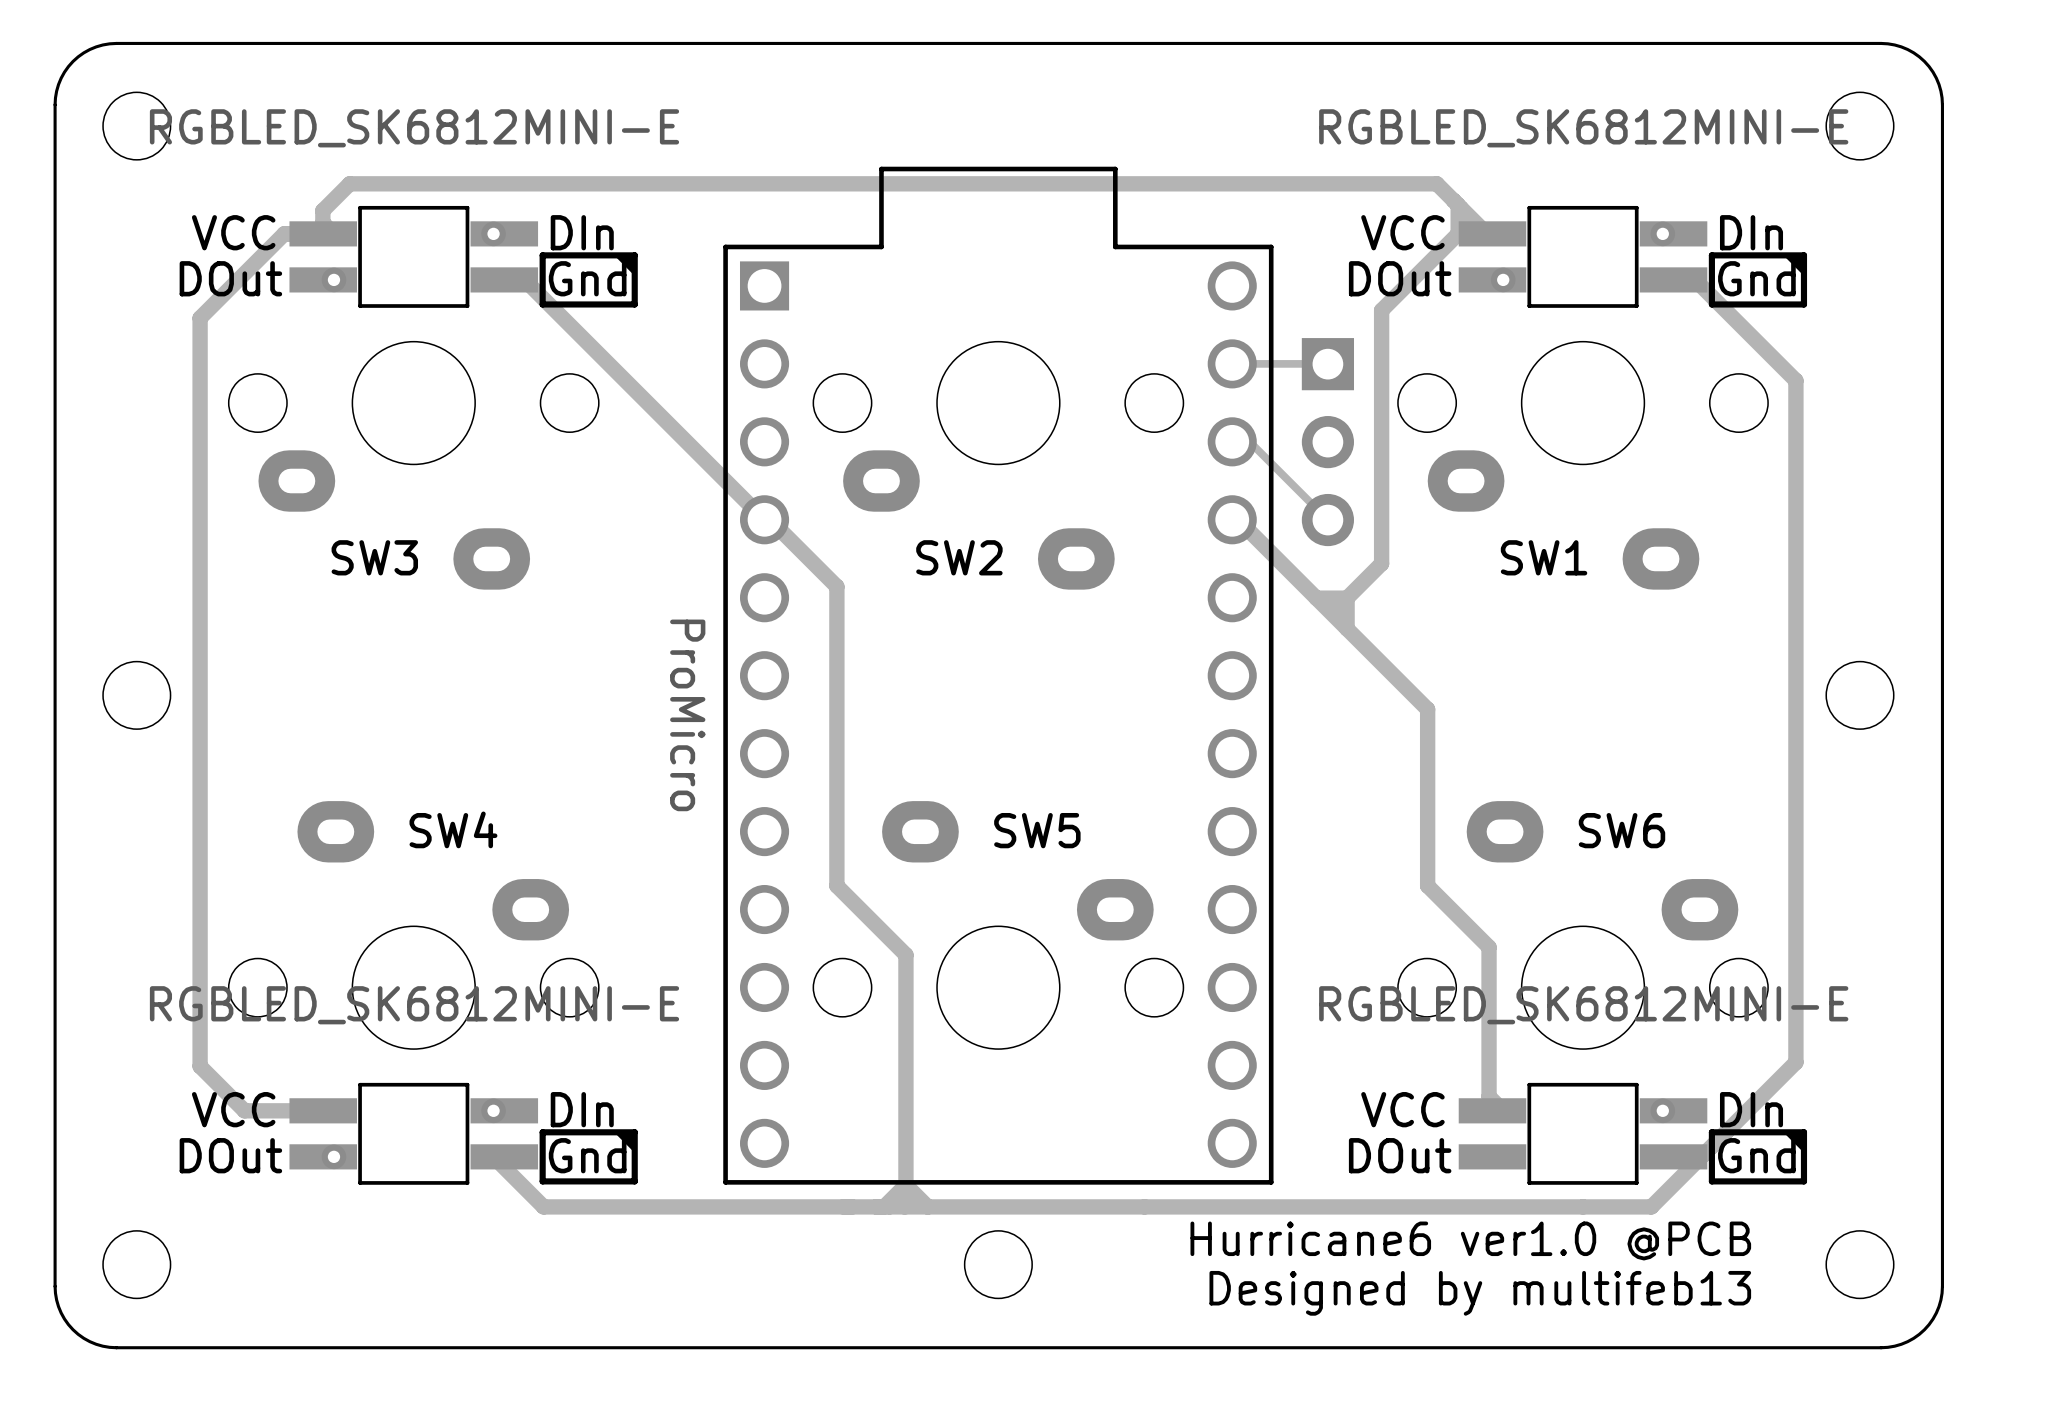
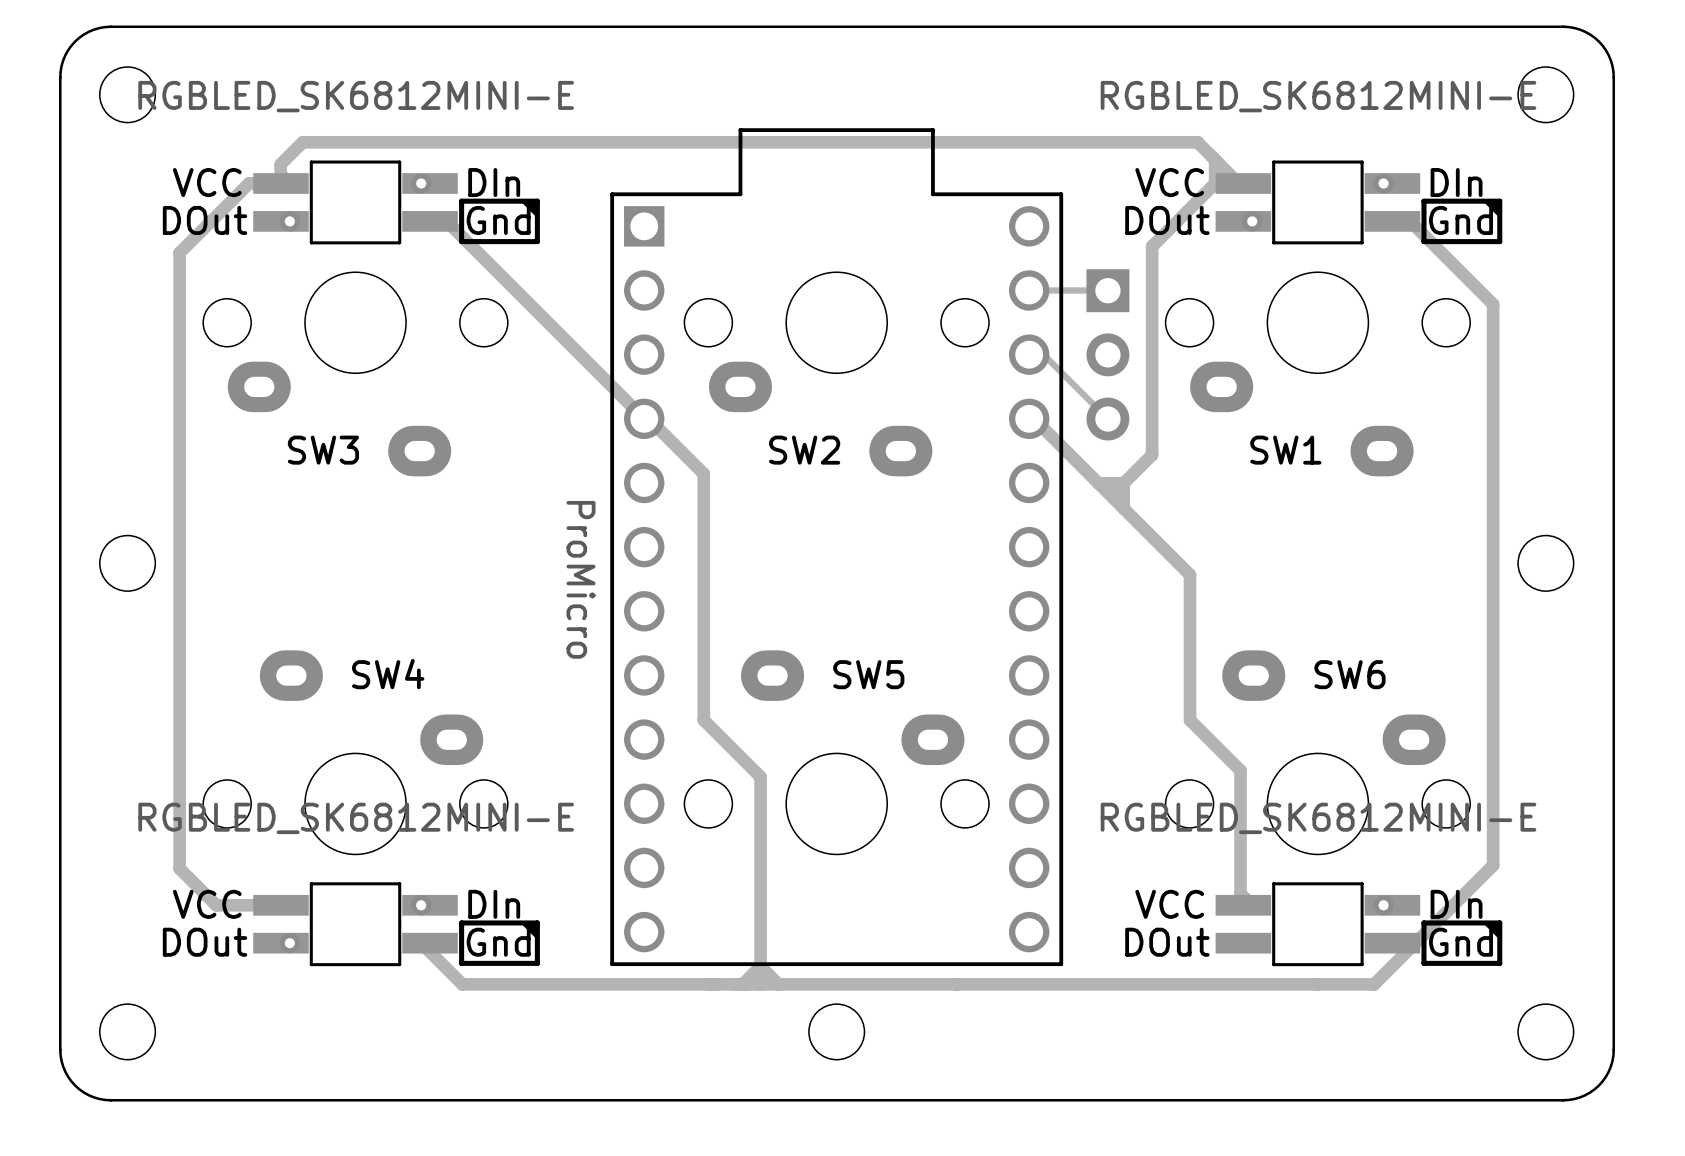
text: Hurricane6 ver1.0 @PCB (1470, 1240) -> none
text: Designed by multifeb13 (1480, 1293) -> none

